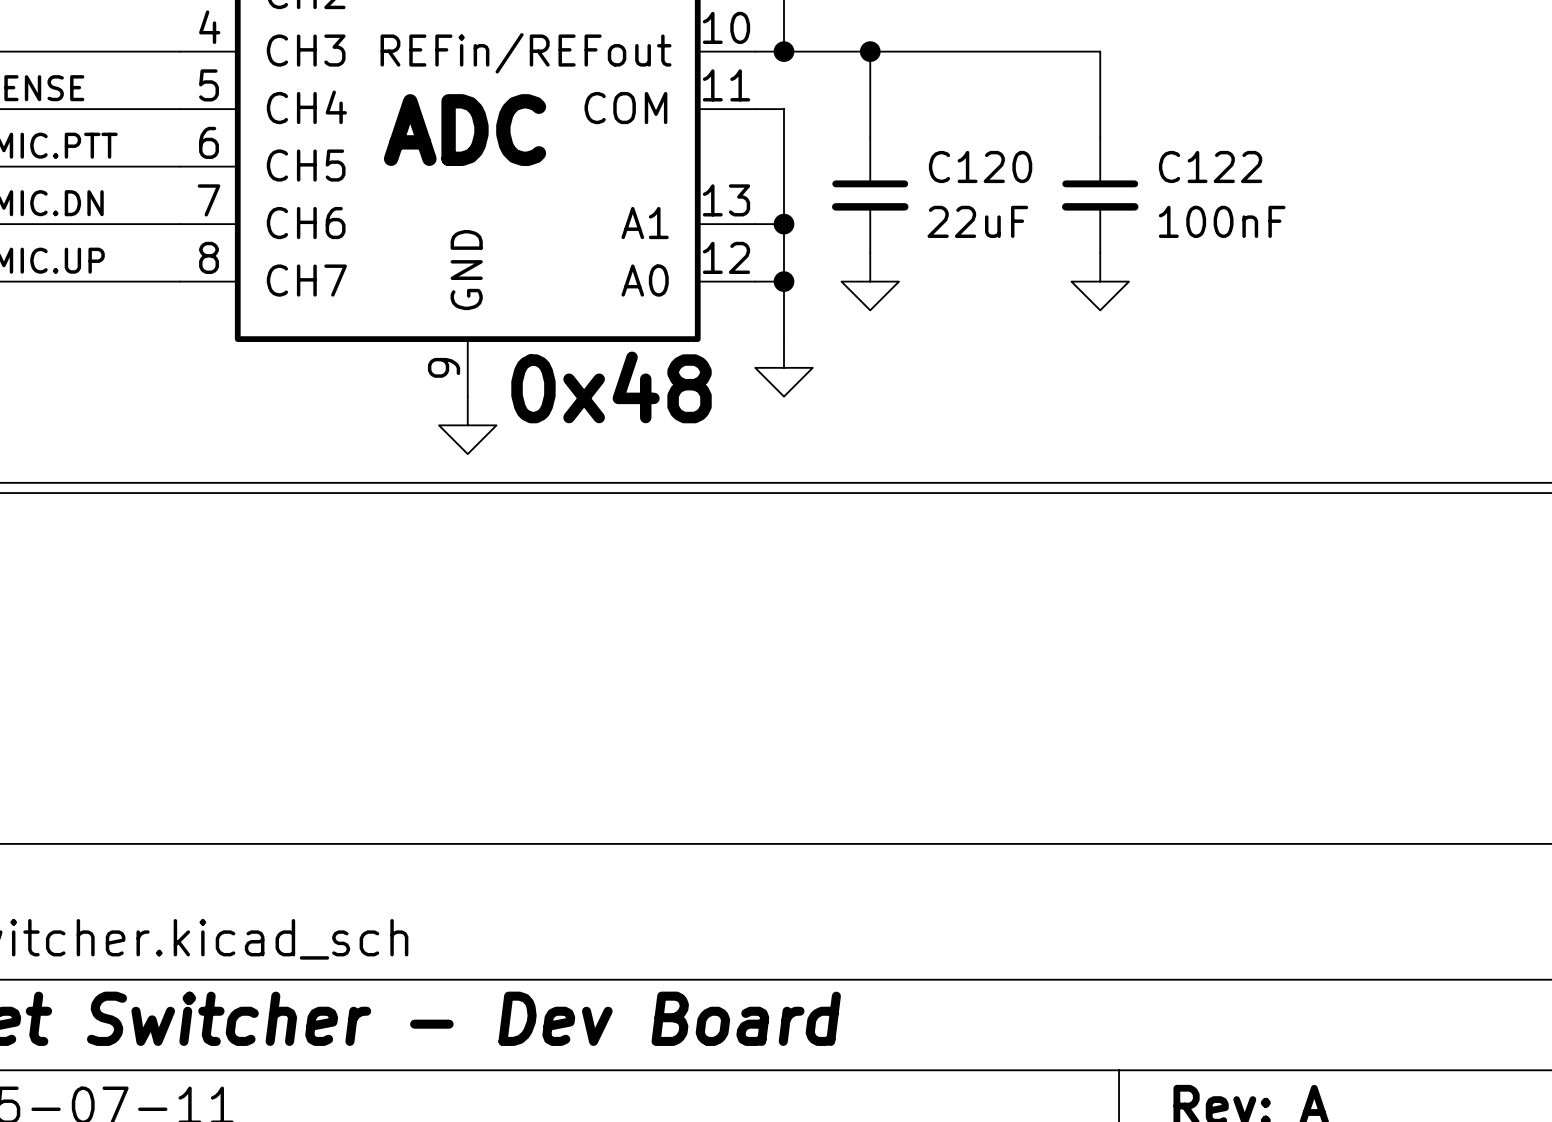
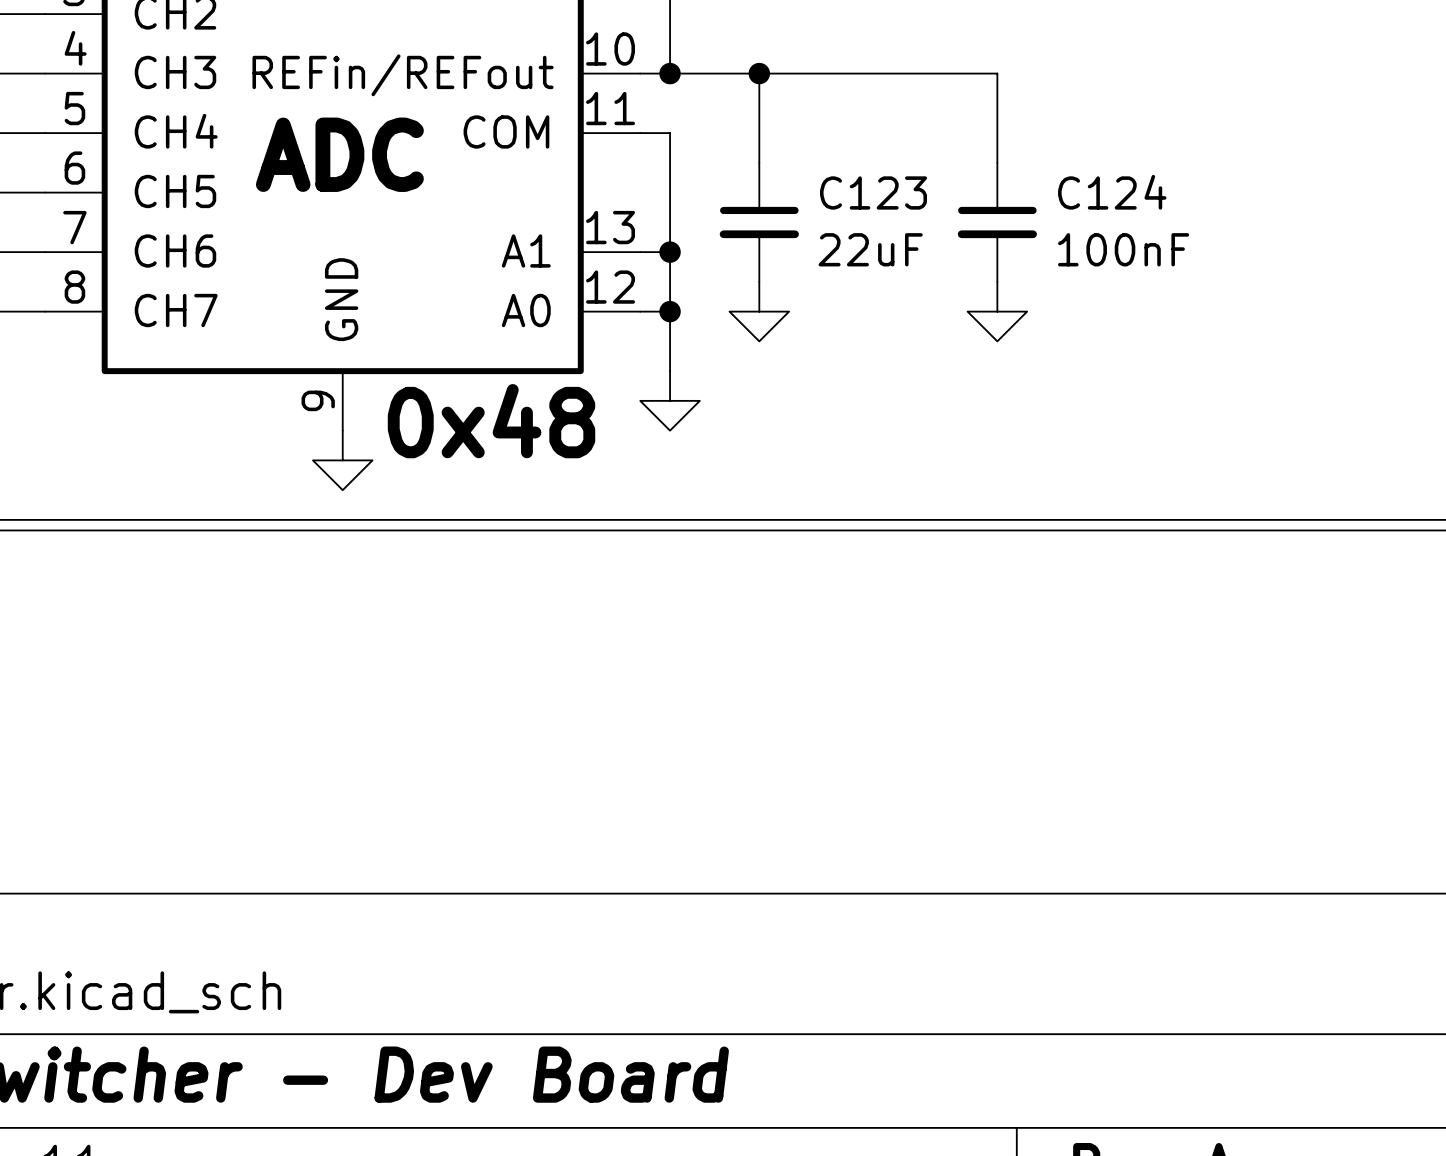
C120 name: C120 (980, 166) -> C123 (873, 192)
C122 name: C122 (1210, 166) -> C124 (1112, 192)

